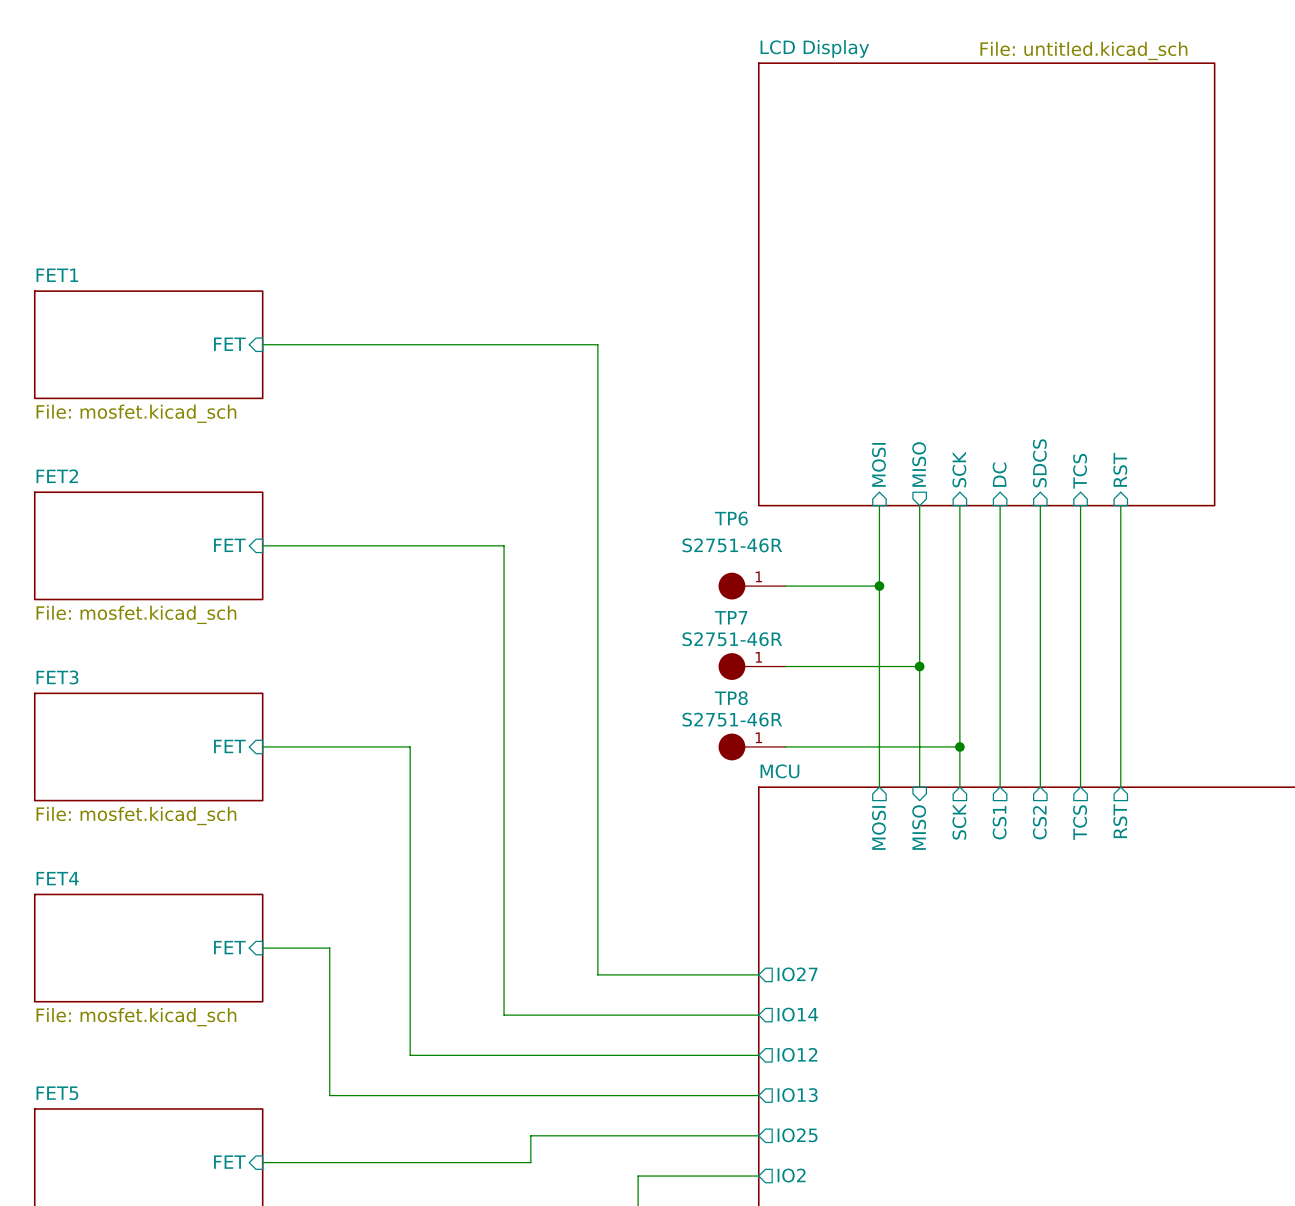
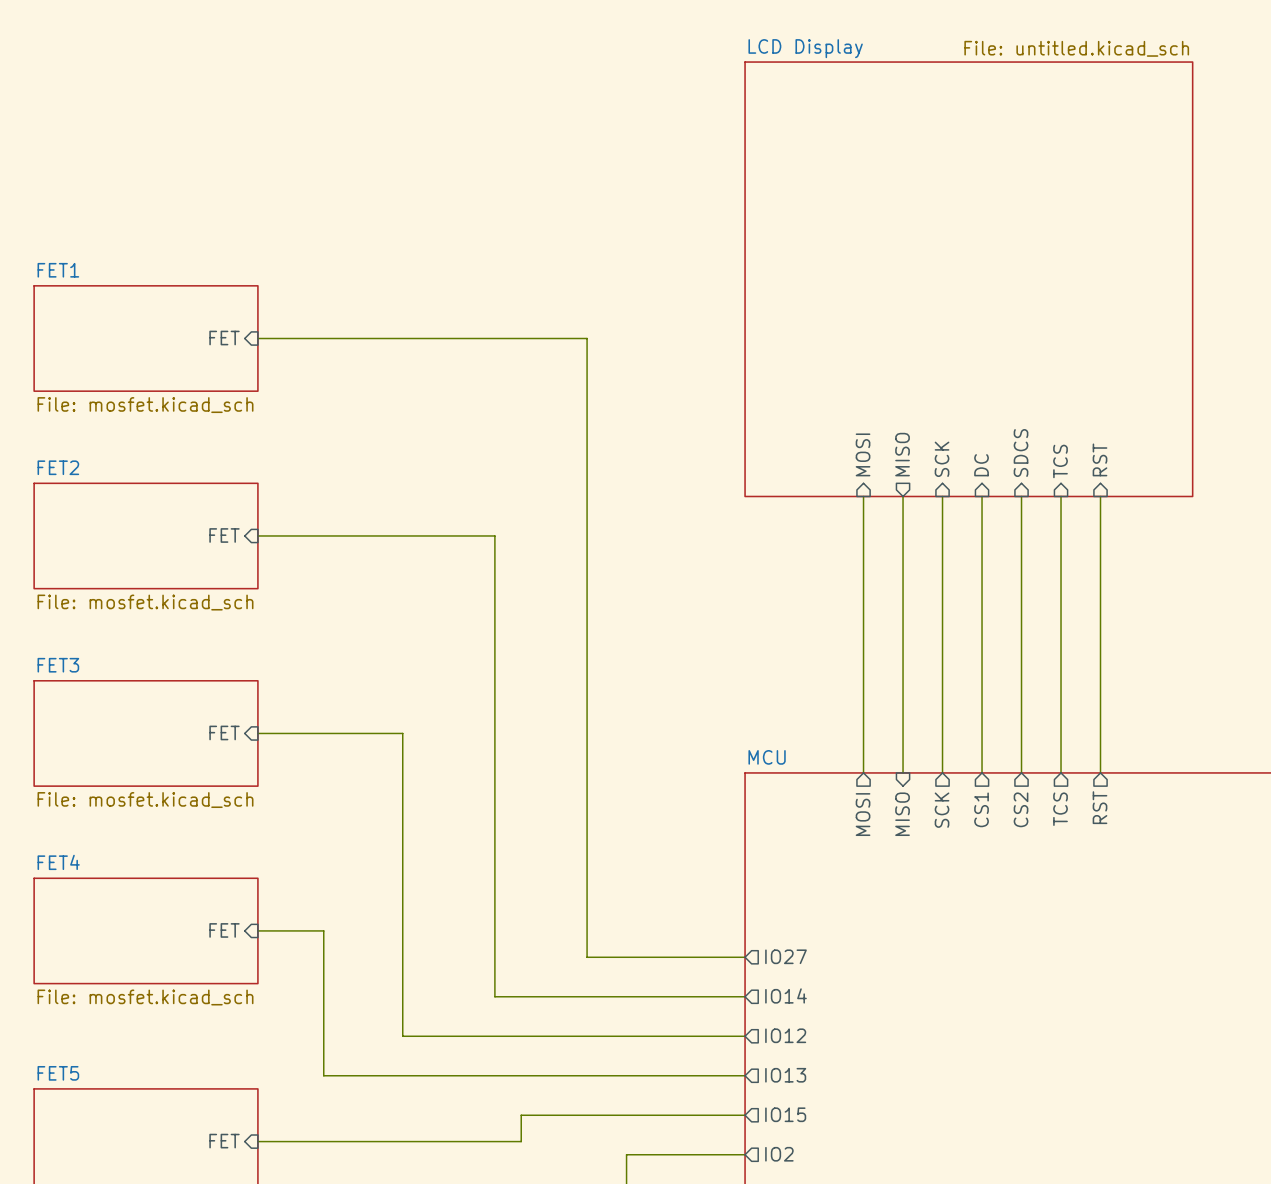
TP6: S2751-46R (752, 586) -> none
wire: (785, 586) (879, 586) -> none
junction: (879, 586) -> none
TP7: S2751-46R (752, 666) -> none
wire: (785, 666) (919, 666) -> none
junction: (919, 666) -> none
TP8: S2751-46R (752, 746) -> none
wire: (785, 746) (959, 746) -> none
junction: (959, 746) -> none
sheet pin: IO25 (797, 1135) -> IO15 (785, 1114)

